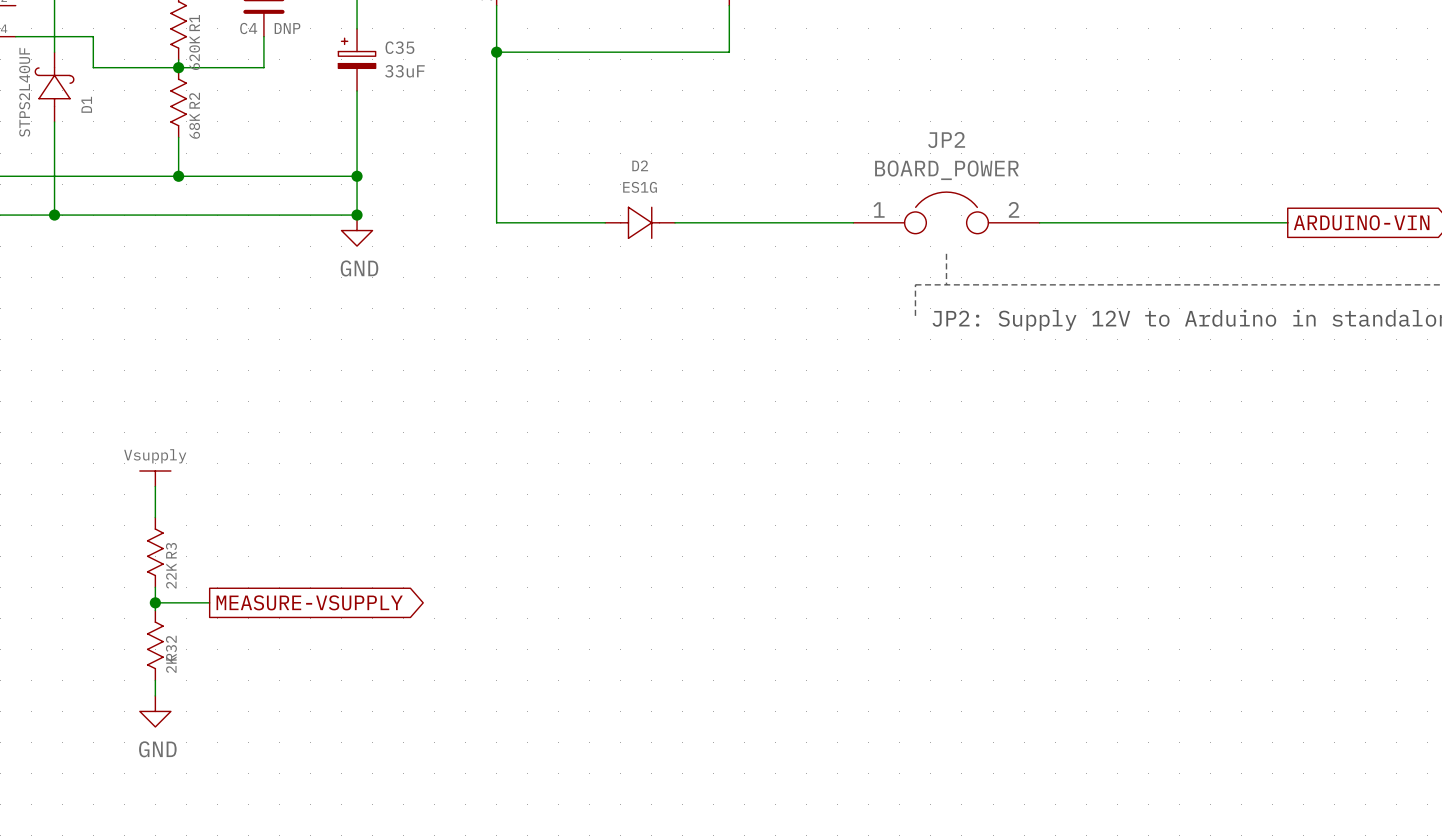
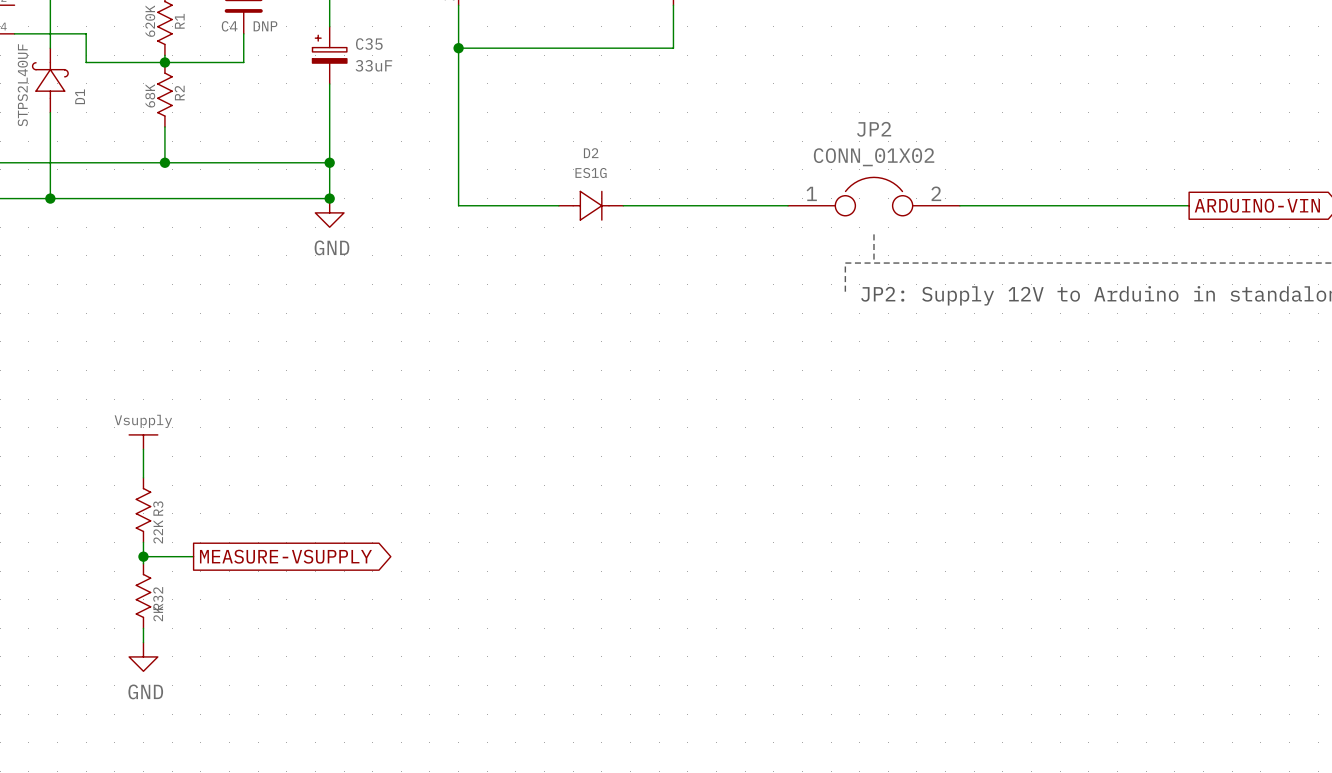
R1 value position: 620K (194, 53) -> 620K (150, 21)
R2 value position: 68K (194, 126) -> 68K (150, 95)
JP2 value: BOARD_POWER (946, 170) -> CONN_01X02 (874, 157)

